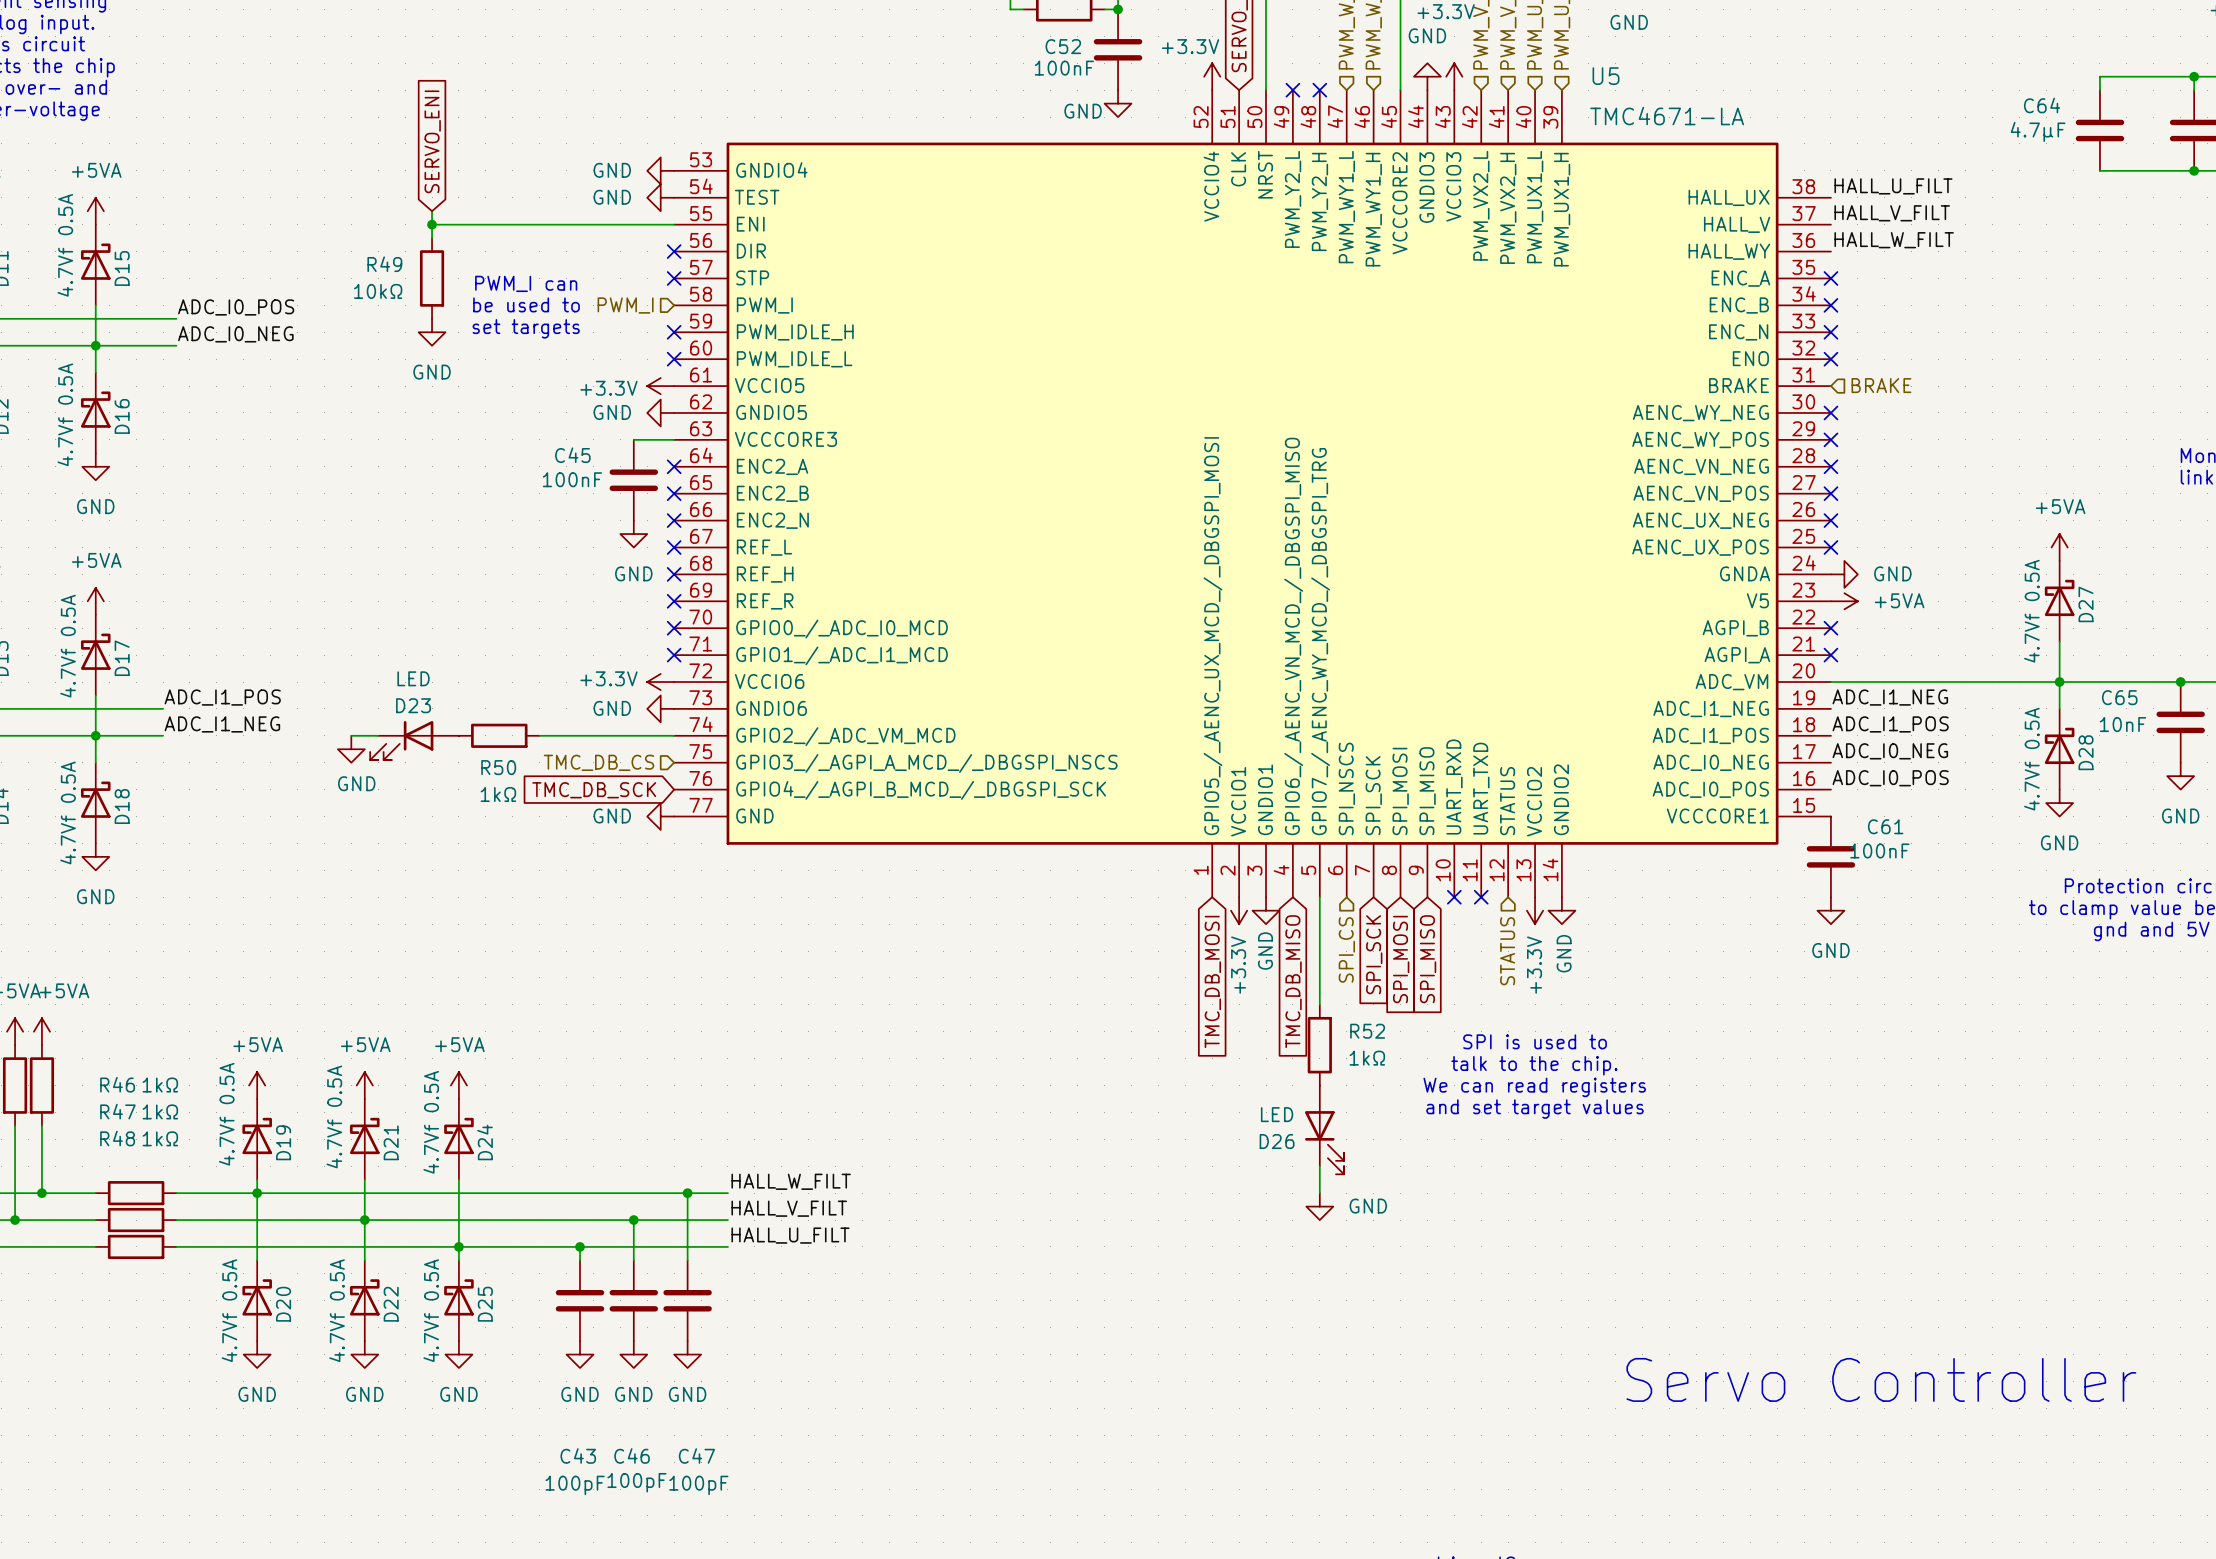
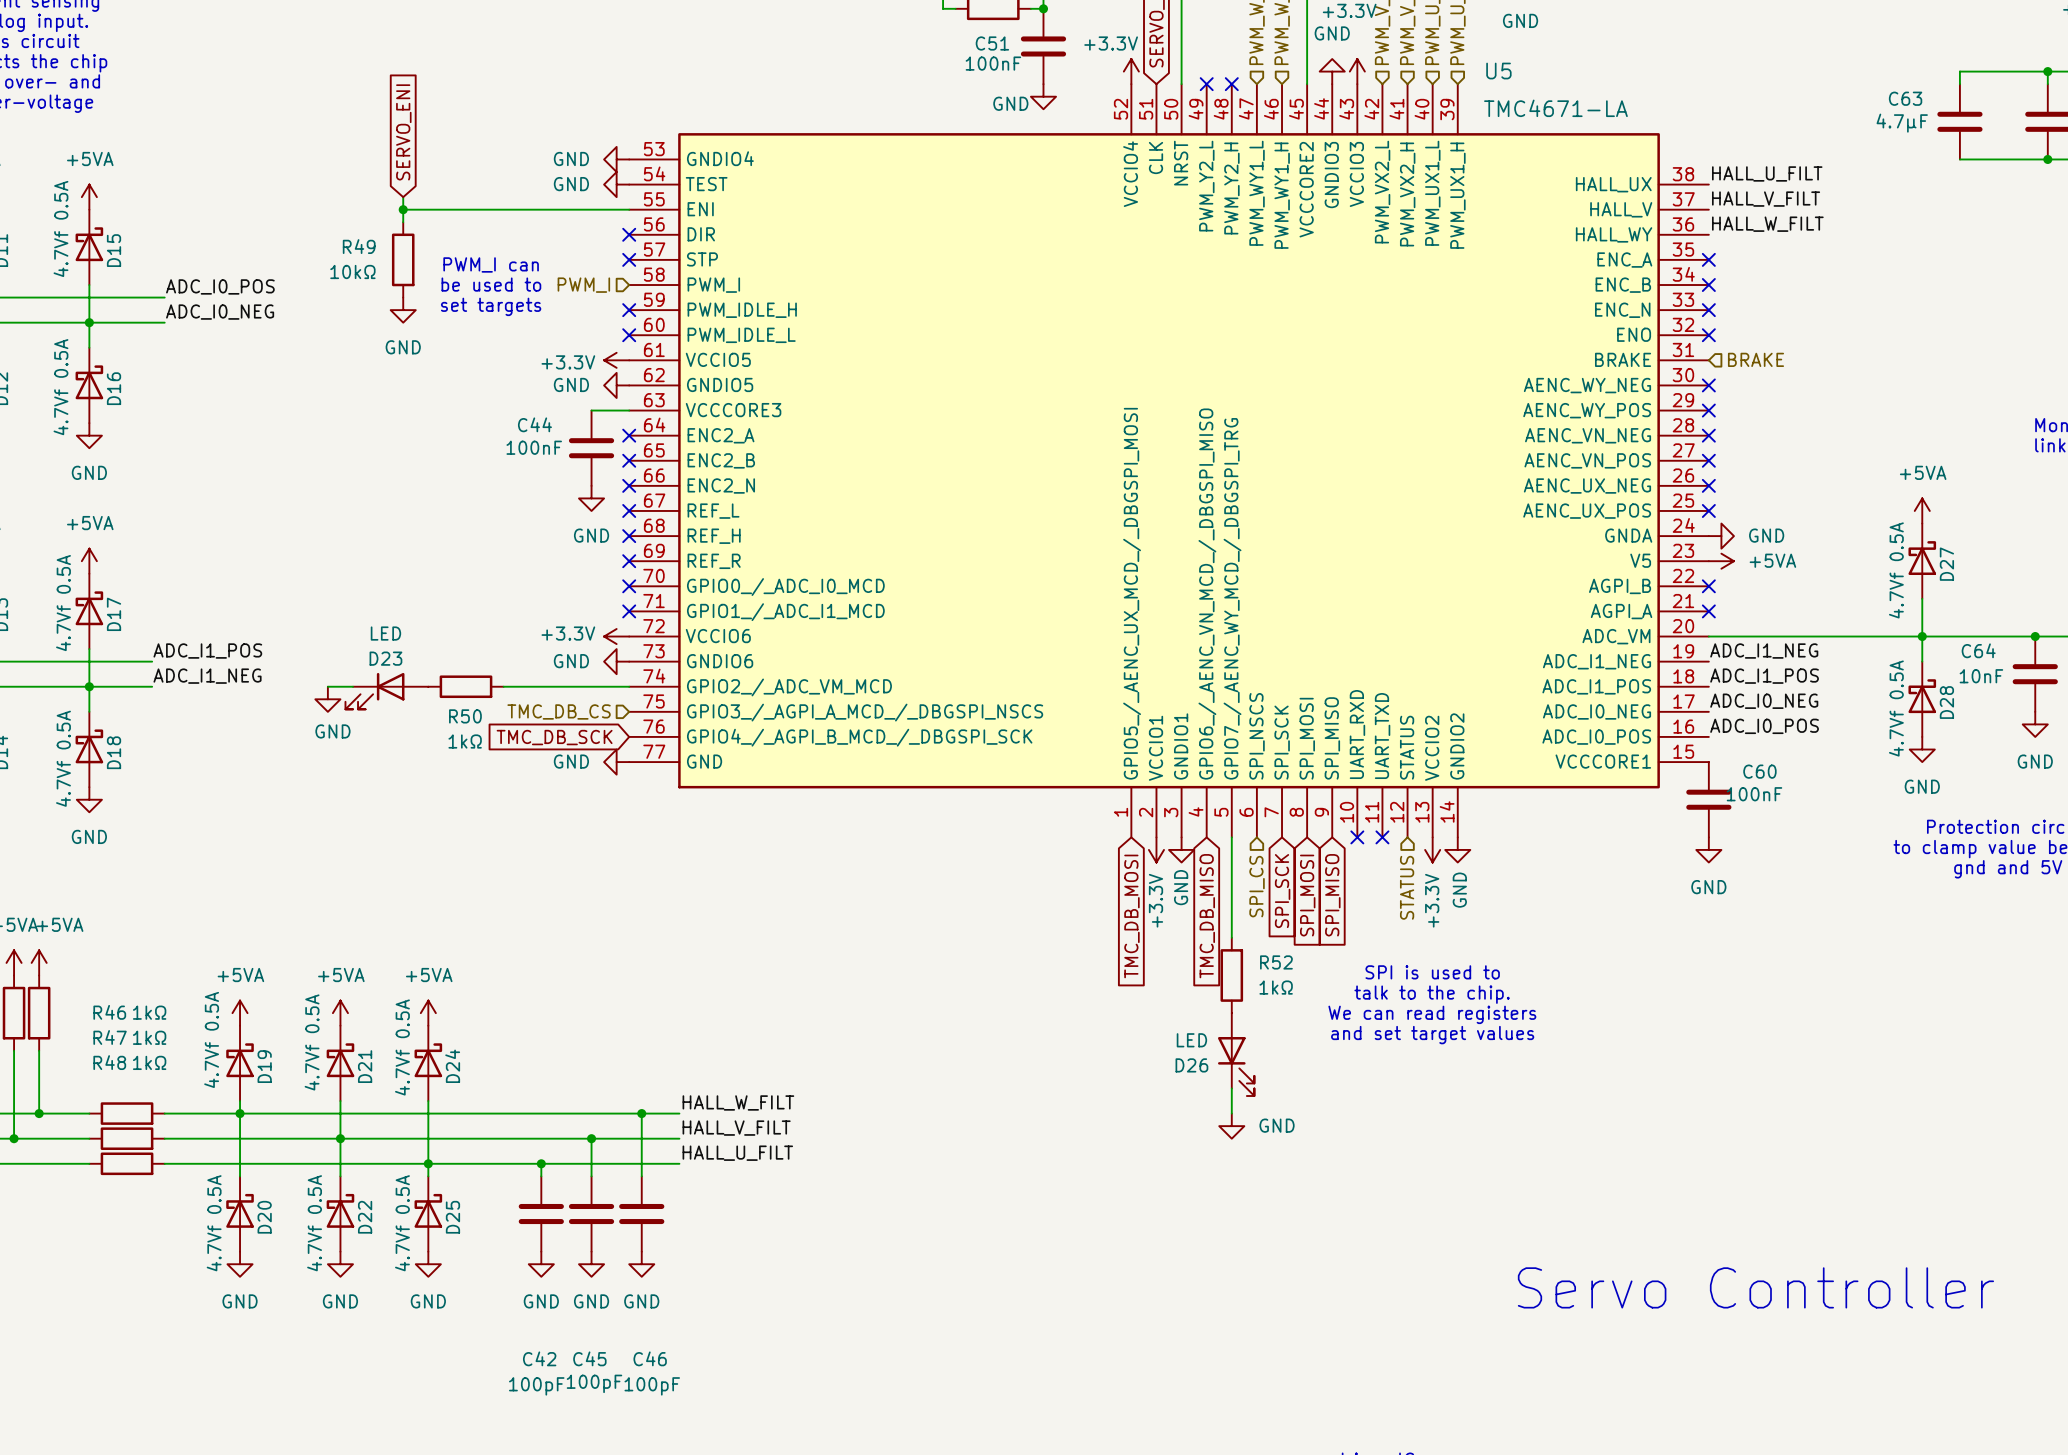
C52 name: C52 (1063, 46) -> C51 (992, 43)
C64 name: C64 (2042, 105) -> C63 (1905, 98)
C45 name: C45 (572, 455) -> C44 (534, 424)
C65 name: C65 (2119, 697) -> C64 (1978, 650)
C61 name: C61 (1885, 826) -> C60 (1759, 771)
C43 name: C43 (578, 1455) -> C42 (539, 1358)
C46 name: C46 (632, 1455) -> C45 (589, 1358)
C47 name: C47 (696, 1455) -> C46 (650, 1358)

